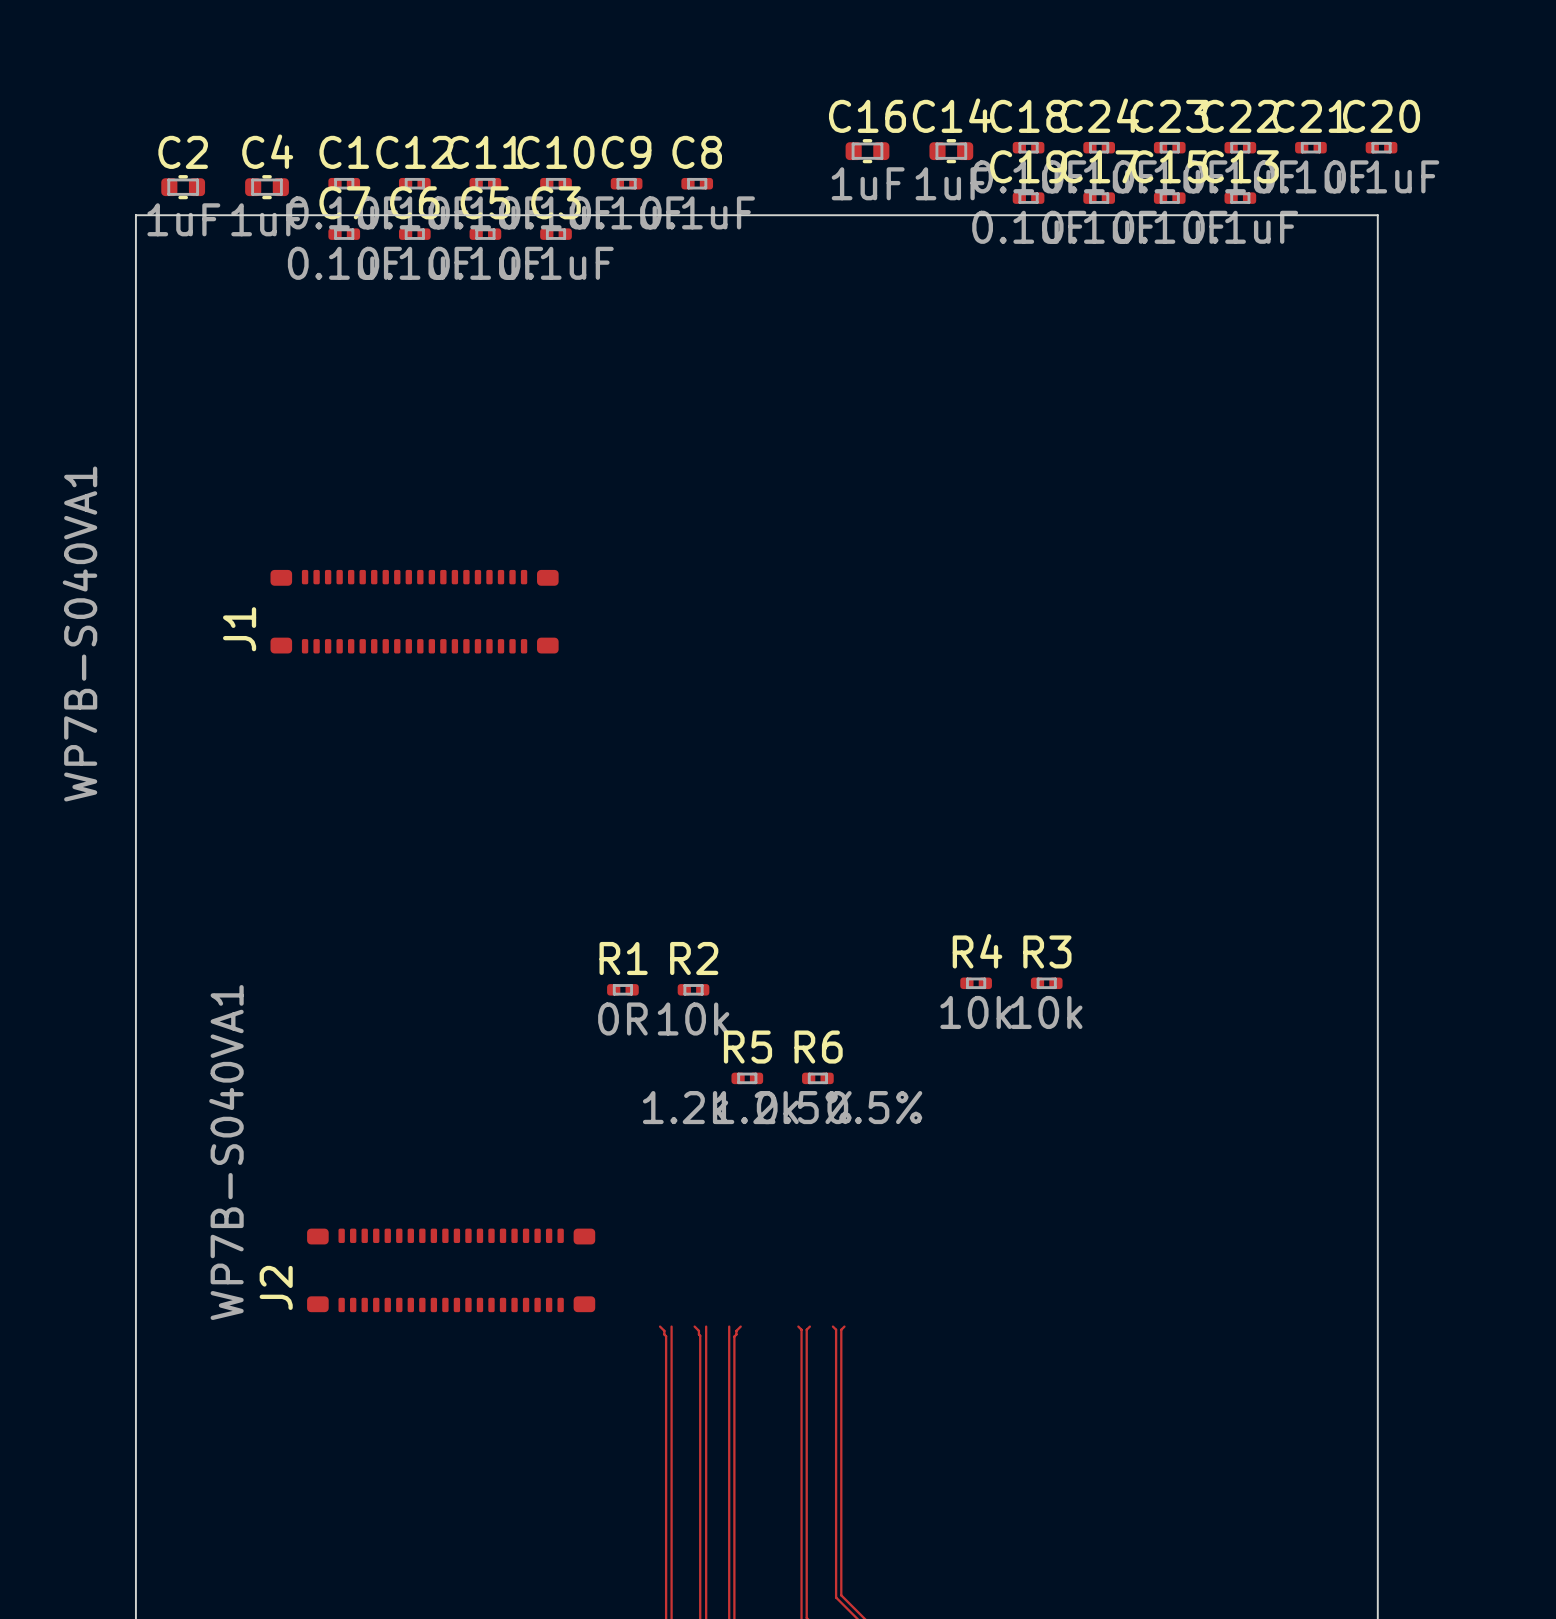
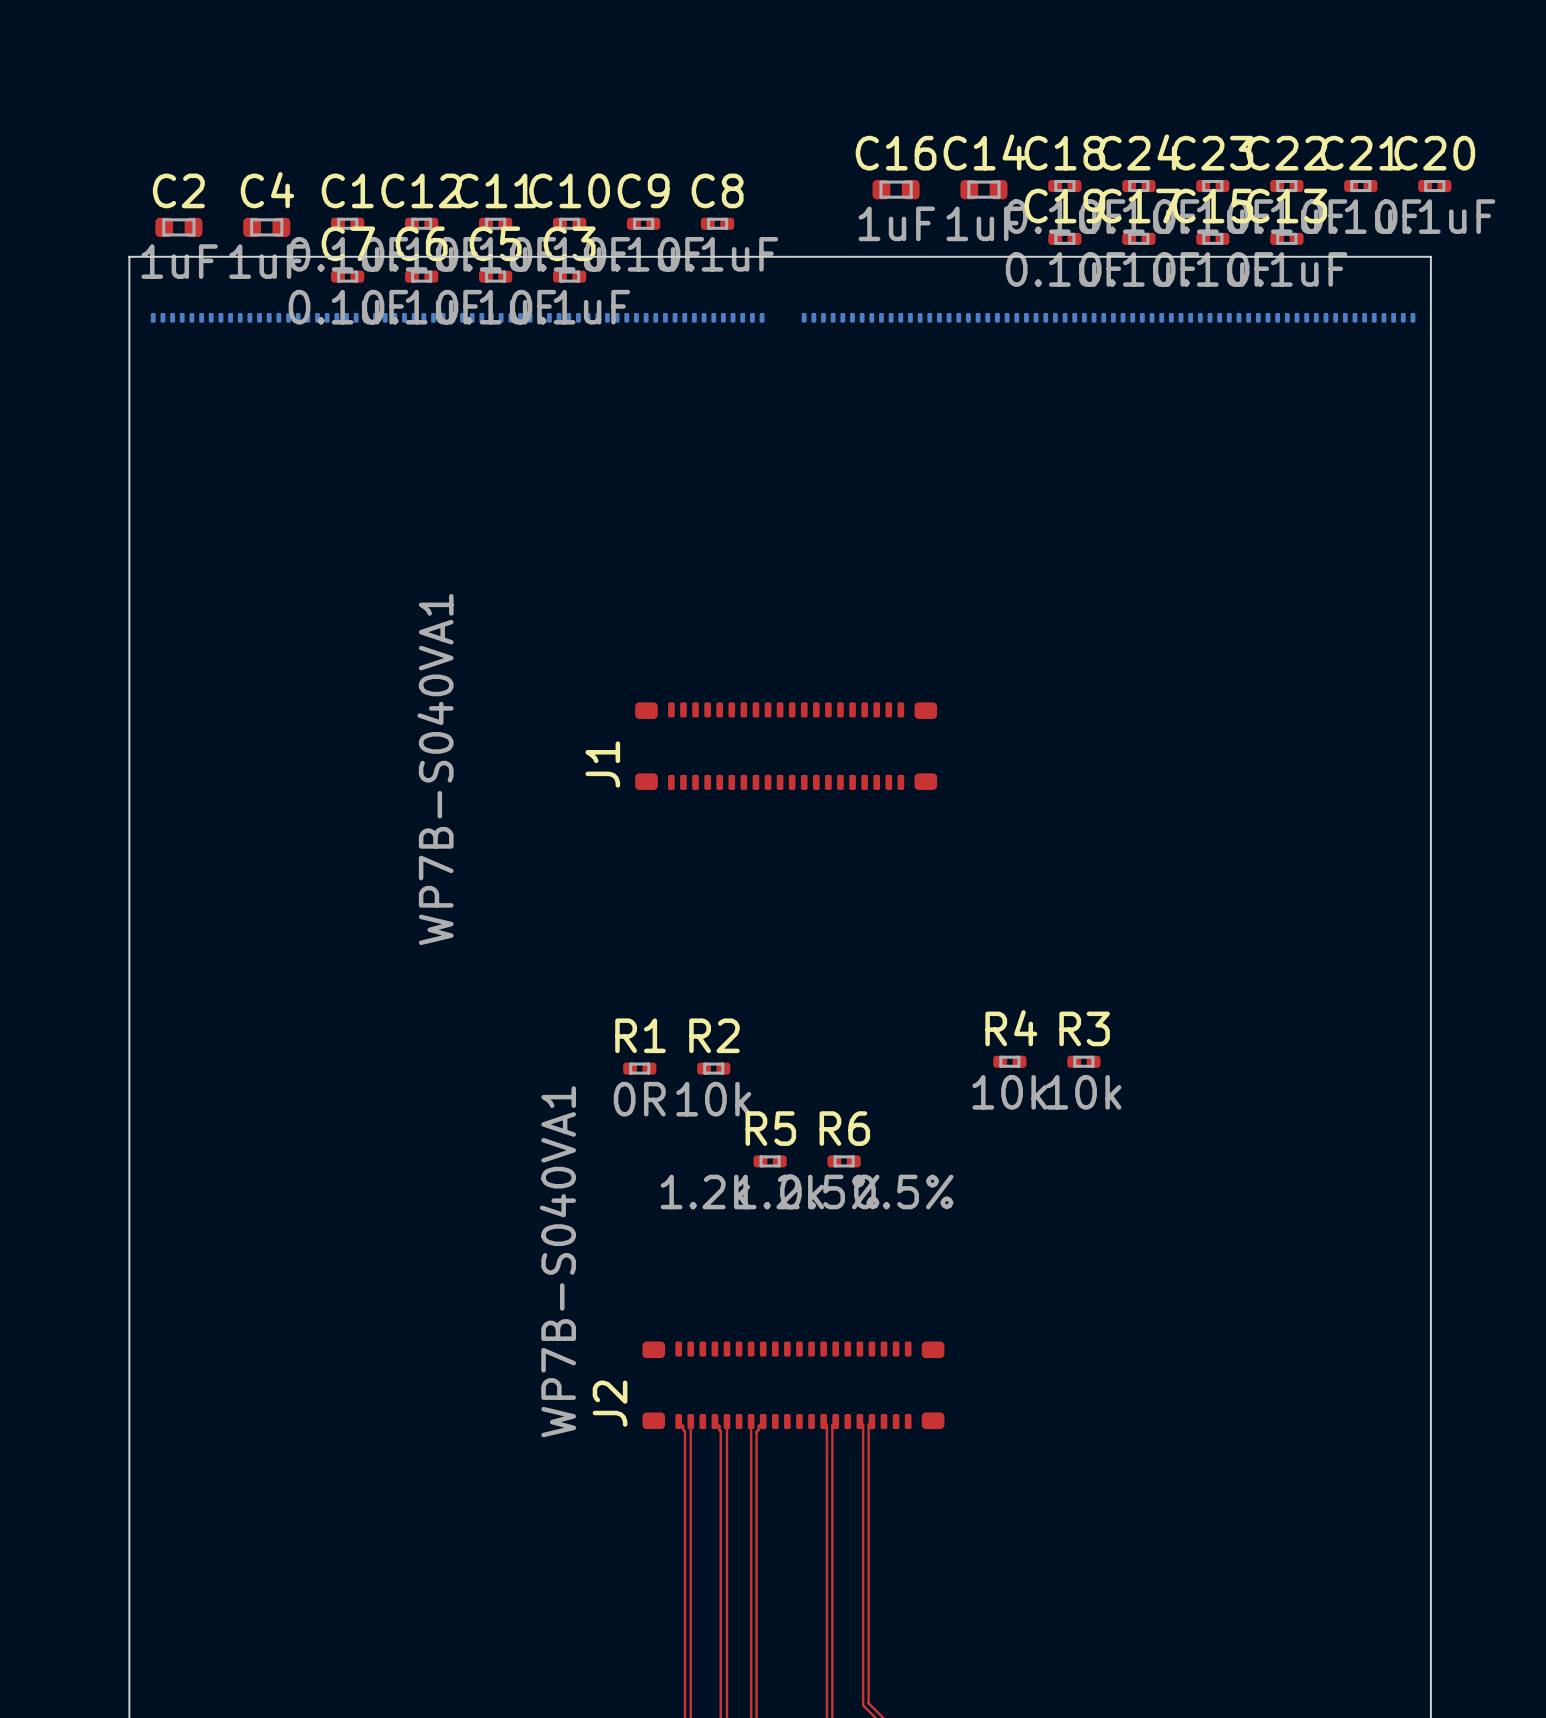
C16 footprint: [845, 139, 890, 164] -> [872, 179, 920, 200]
C14 footprint: [929, 139, 974, 164] -> [960, 179, 1008, 200]
C2 footprint: [161, 175, 206, 200] -> [155, 217, 203, 238]
C4 footprint: [245, 175, 289, 200] -> [243, 217, 291, 238]
part: none -> (457, 317)
part: none -> (1108, 317)
J1 position: (414, 611) -> (786, 746)
J2 position: (451, 1270) -> (793, 1385)

